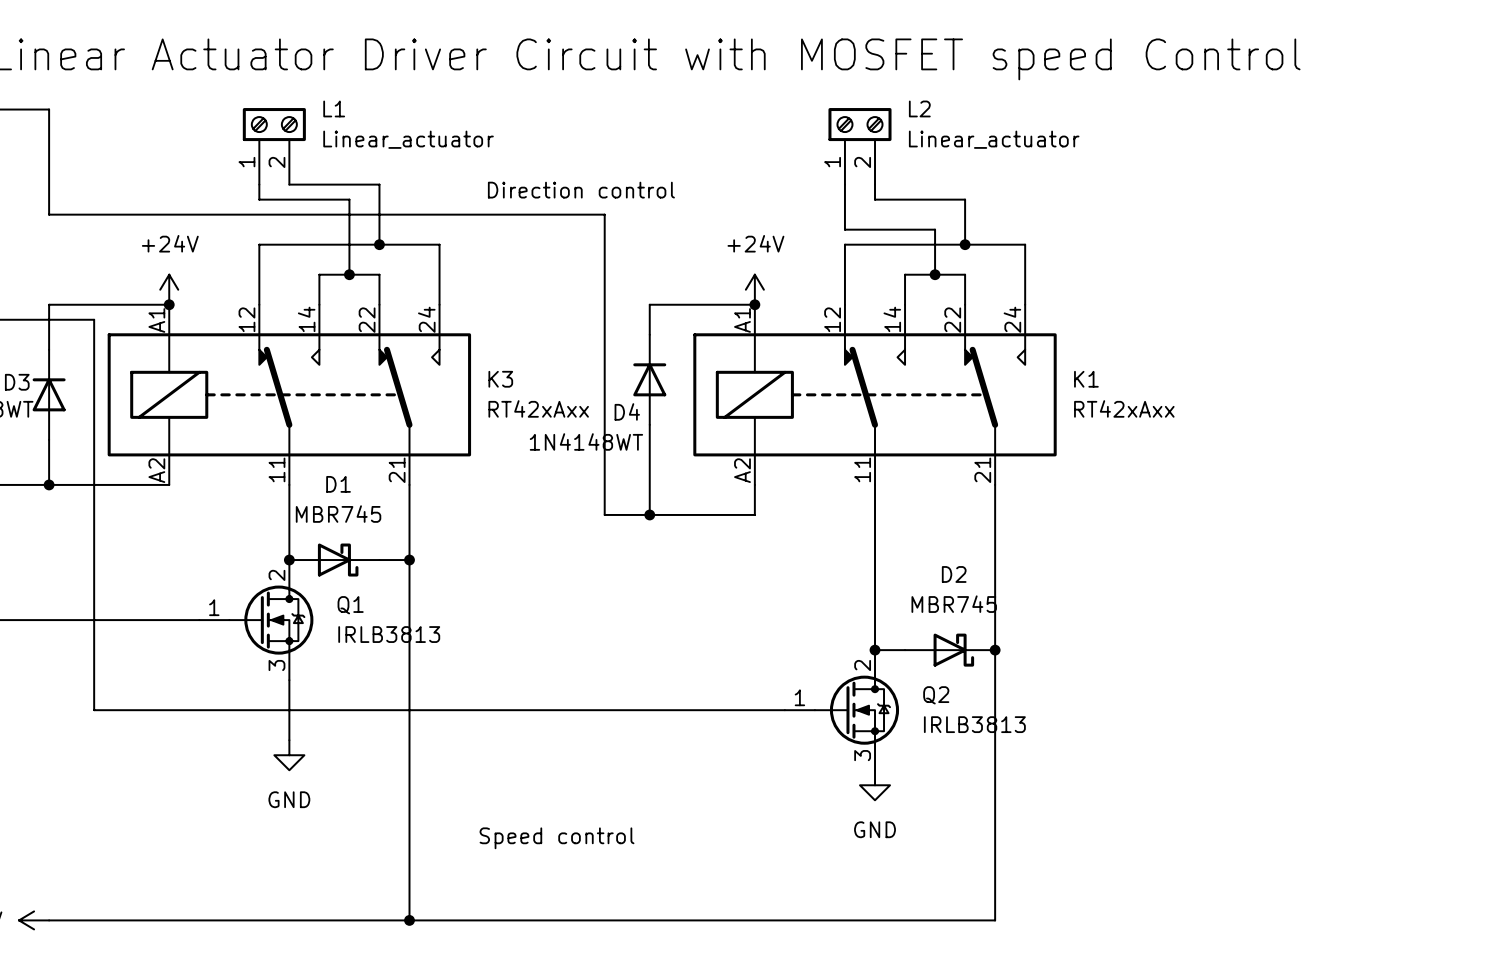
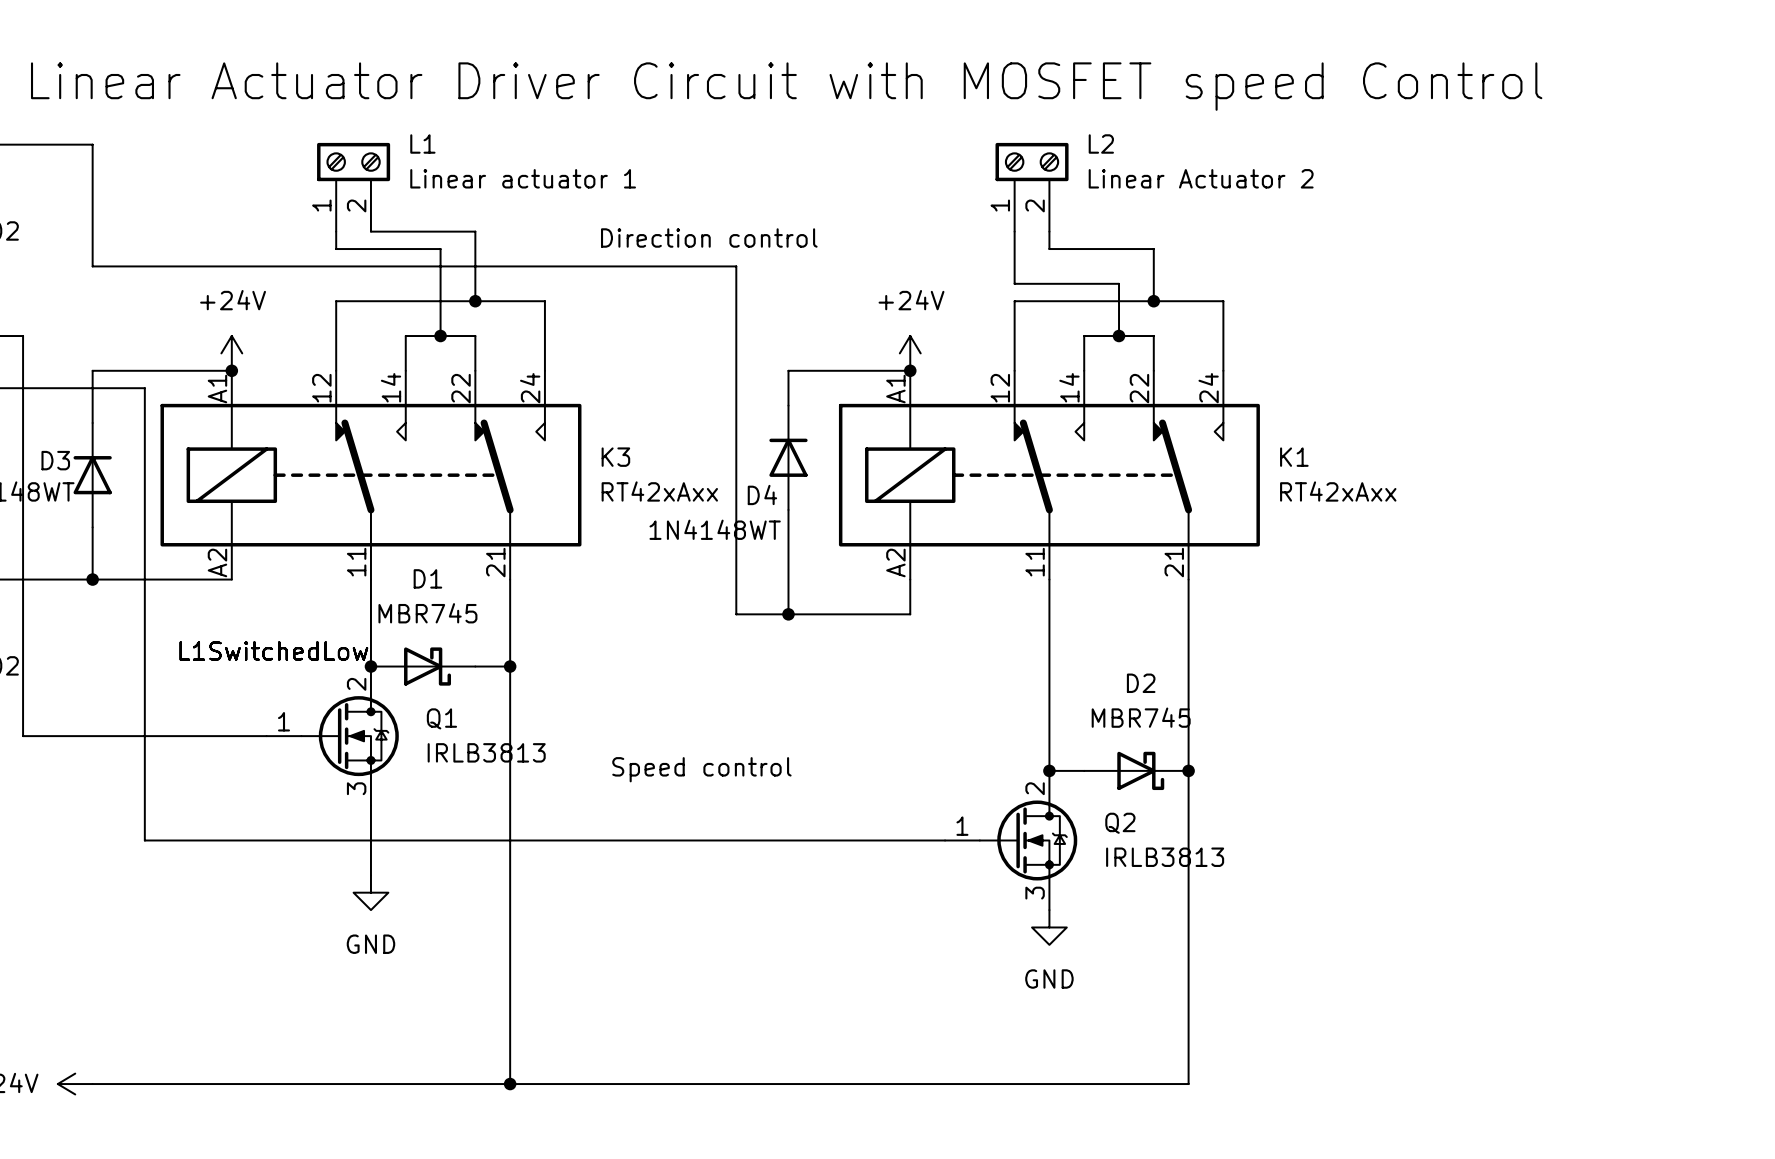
L1 value: Linear_actuator (408, 139) -> Linear actuator 1 (523, 178)
L2 value: Linear_actuator (994, 139) -> Linear Actuator 2 (1201, 178)
label: none -> L1SwitchedLow (273, 651)
text position: Speed control (557, 838) -> Speed control (701, 769)

